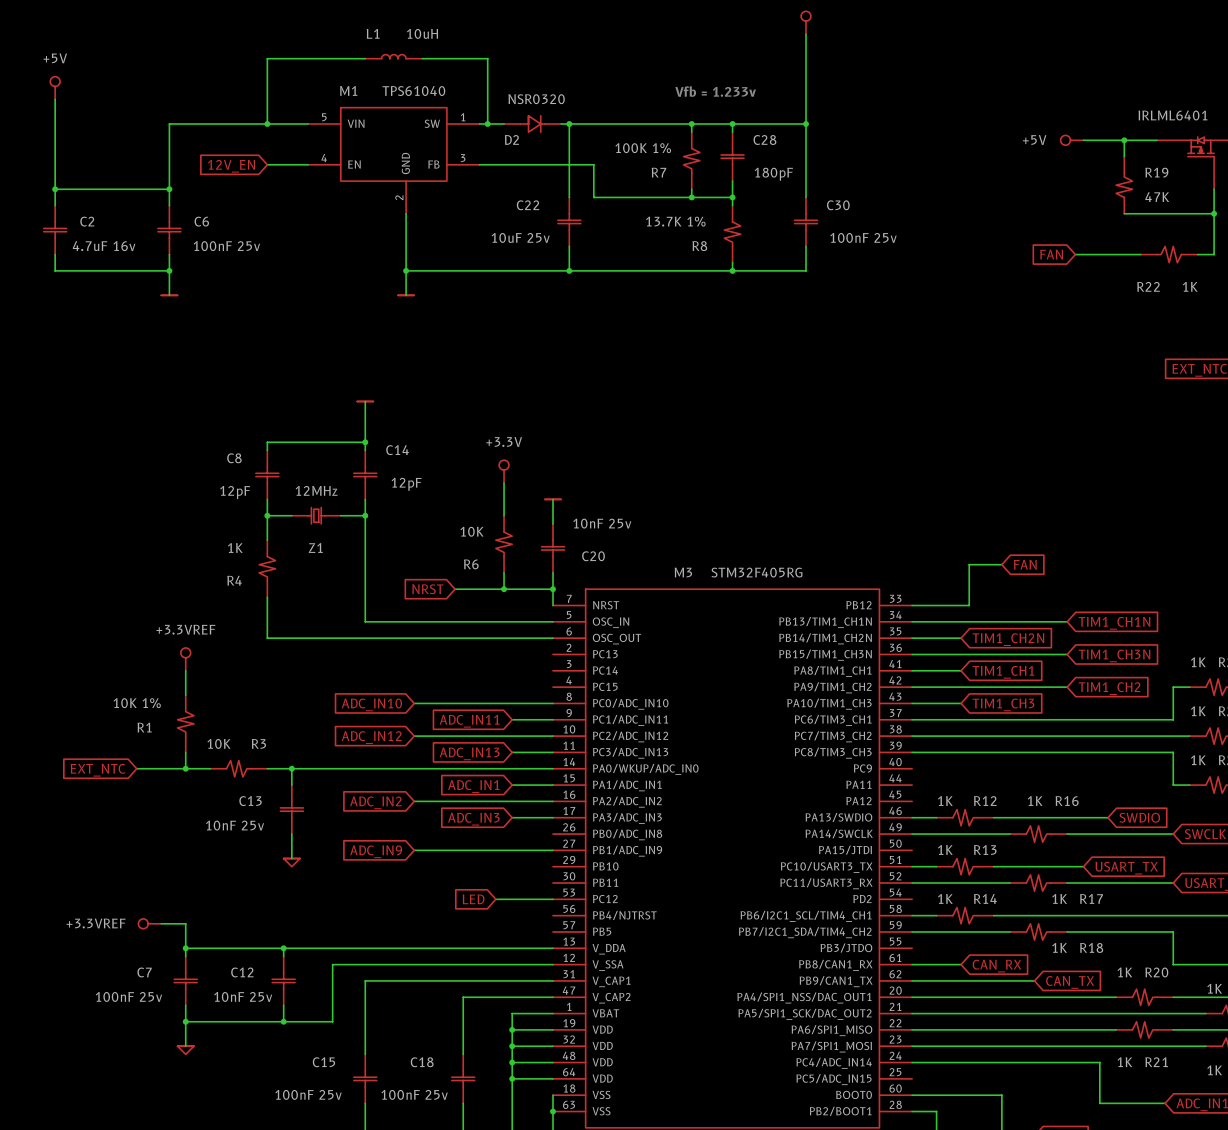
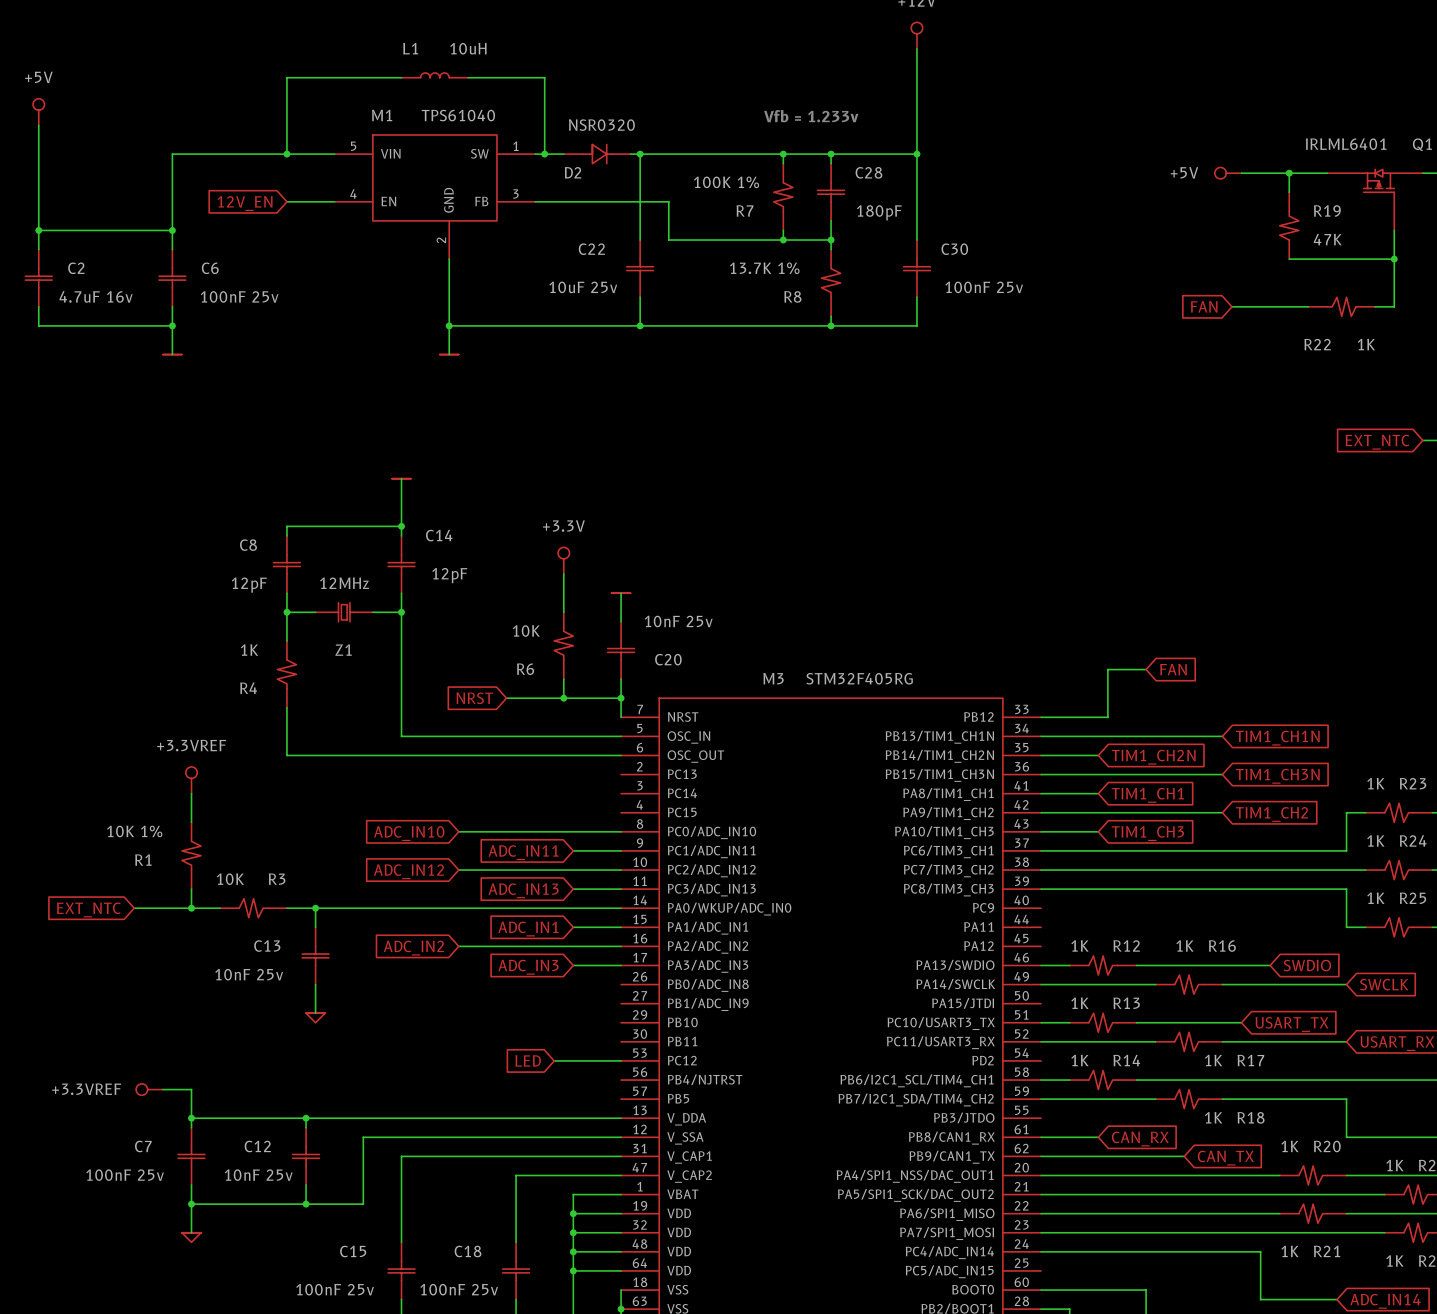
wire: (414, 850) (553, 850) -> none
global label: ADC_IN9 (376, 851) -> none

